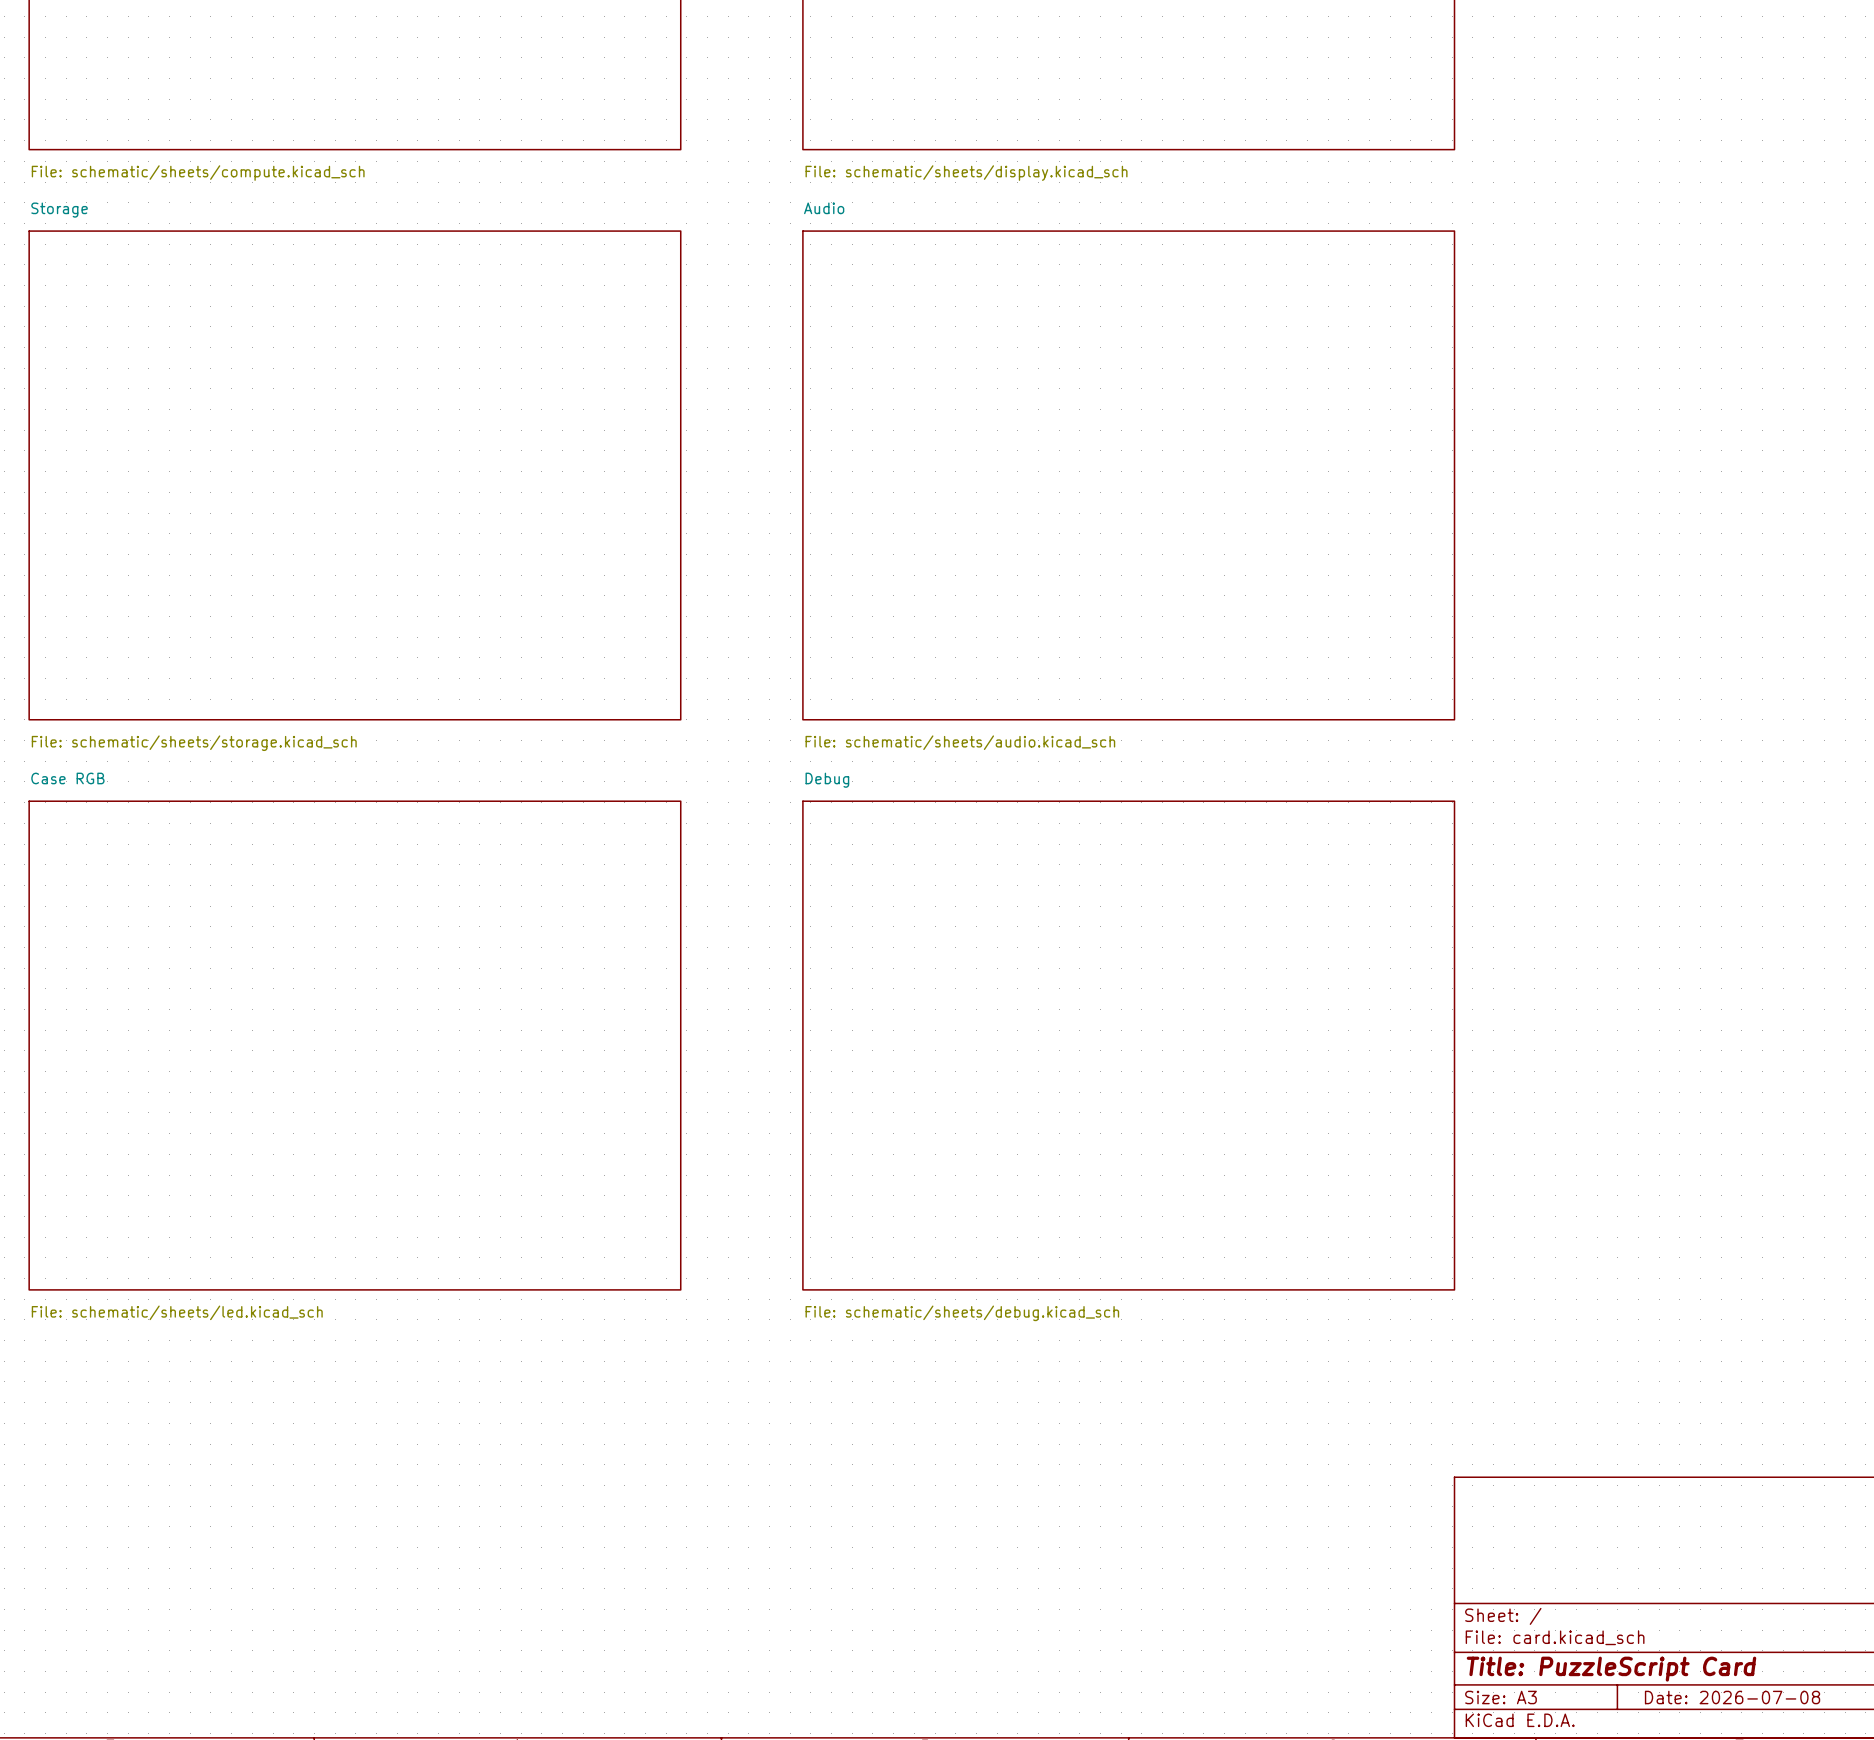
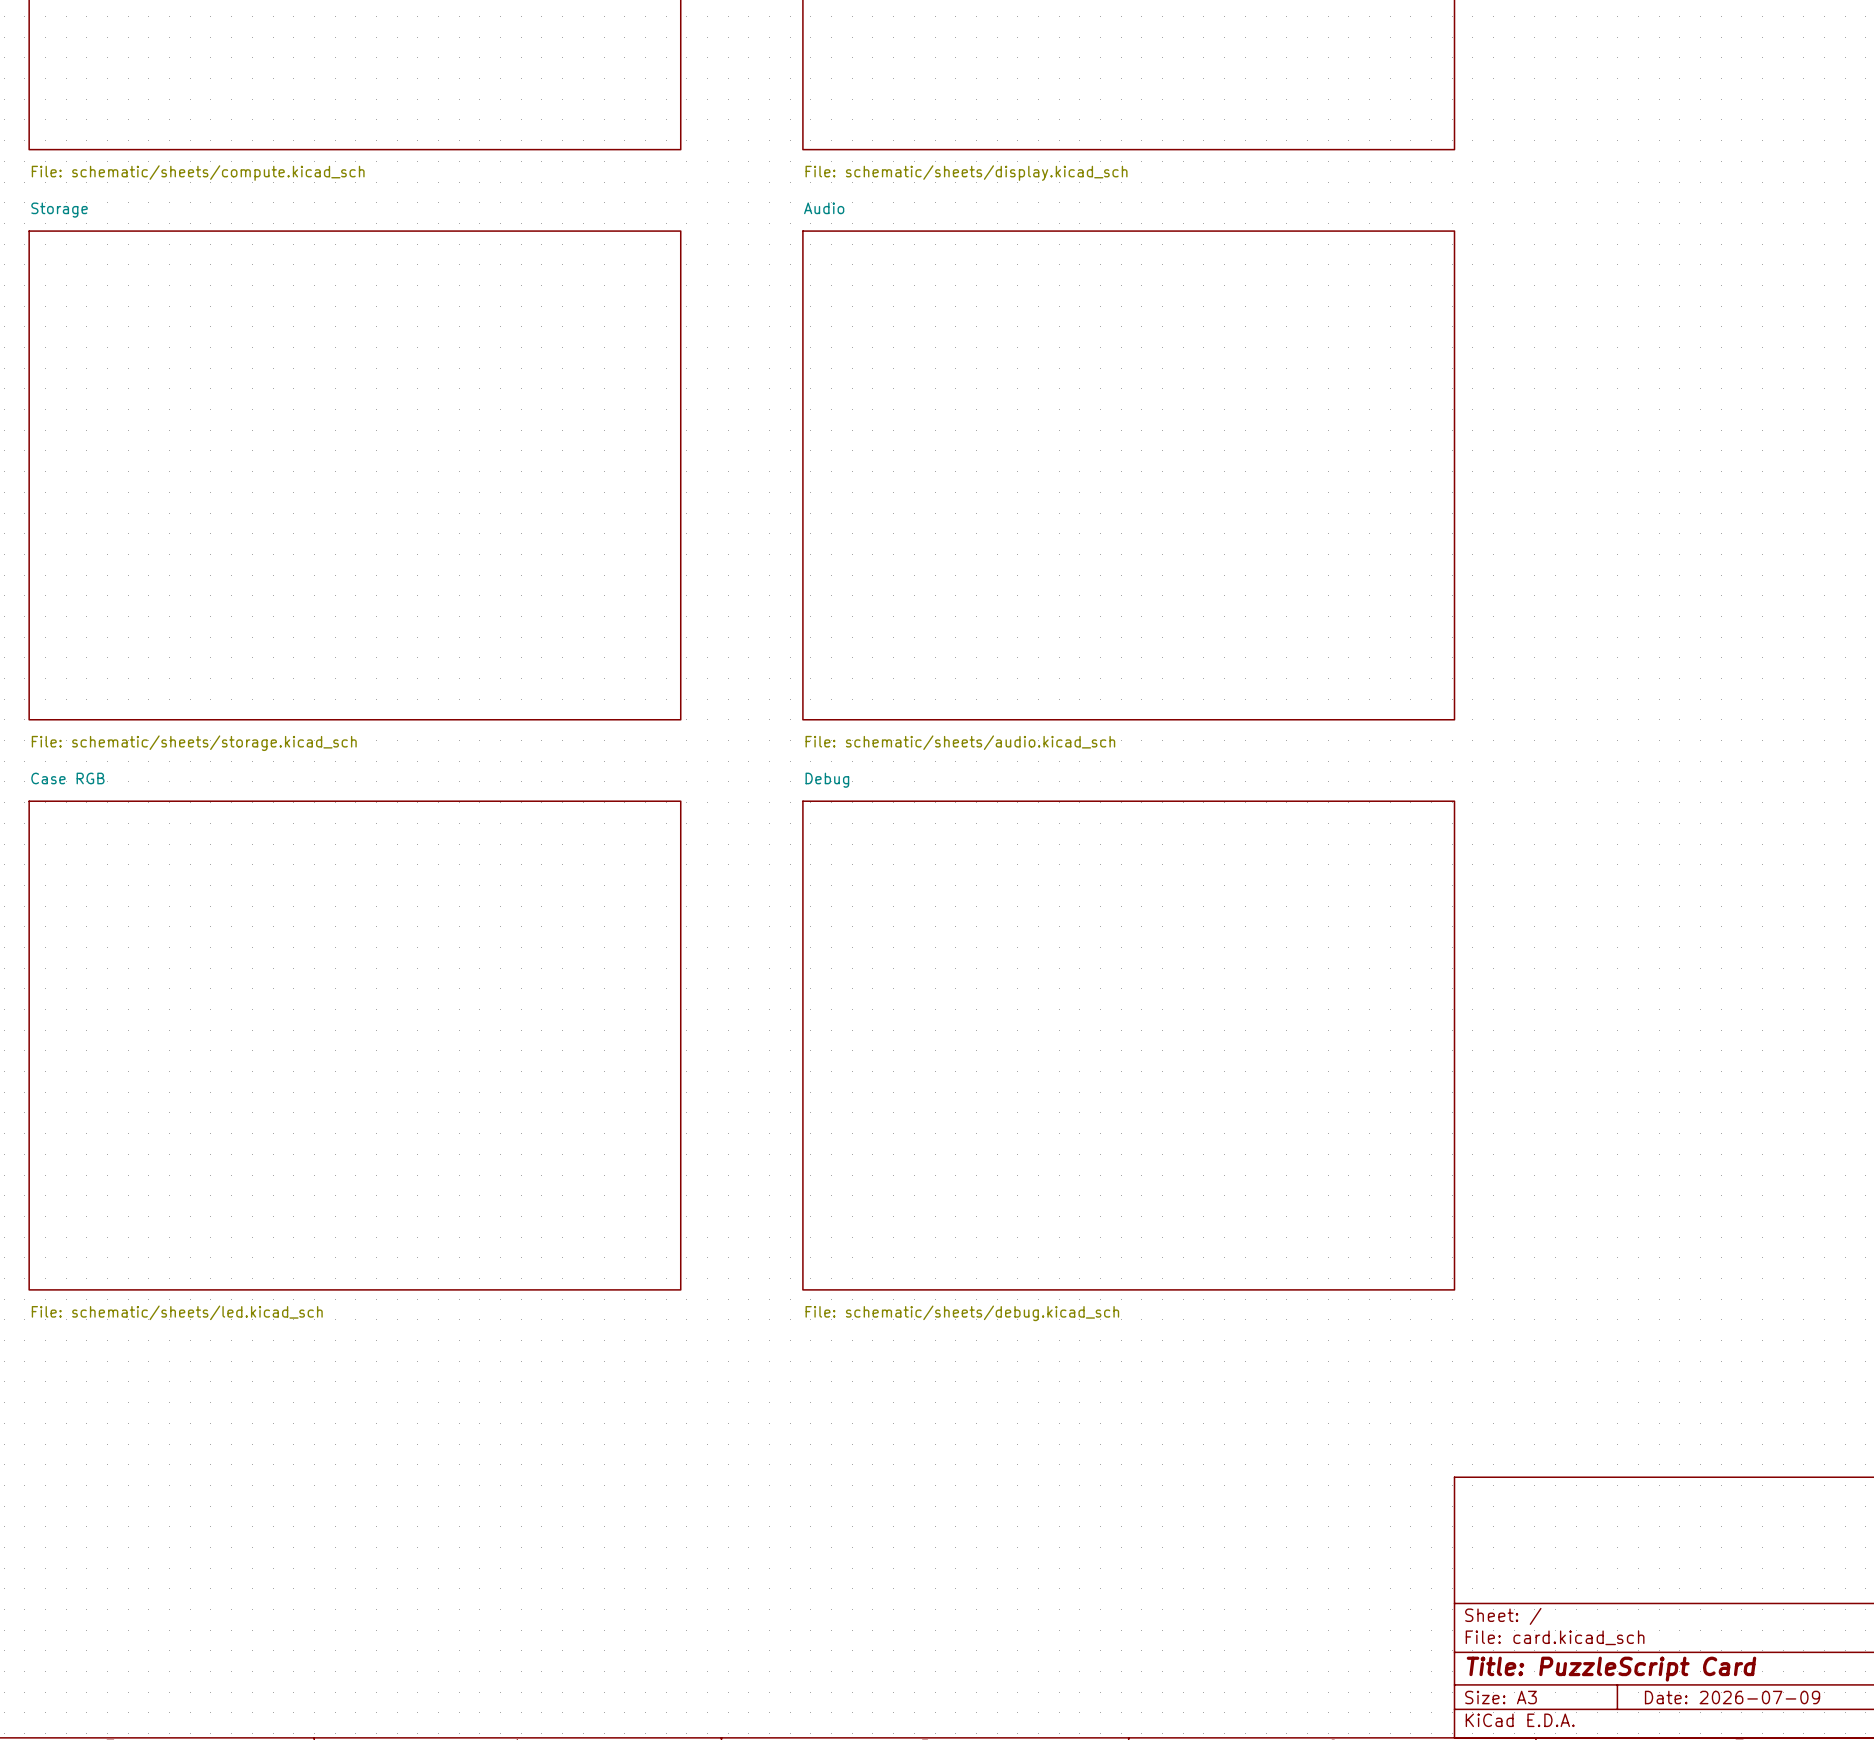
title block: Date: 2026-07-08 (1732, 1697) -> Date: 2026-07-09 (1732, 1697)

